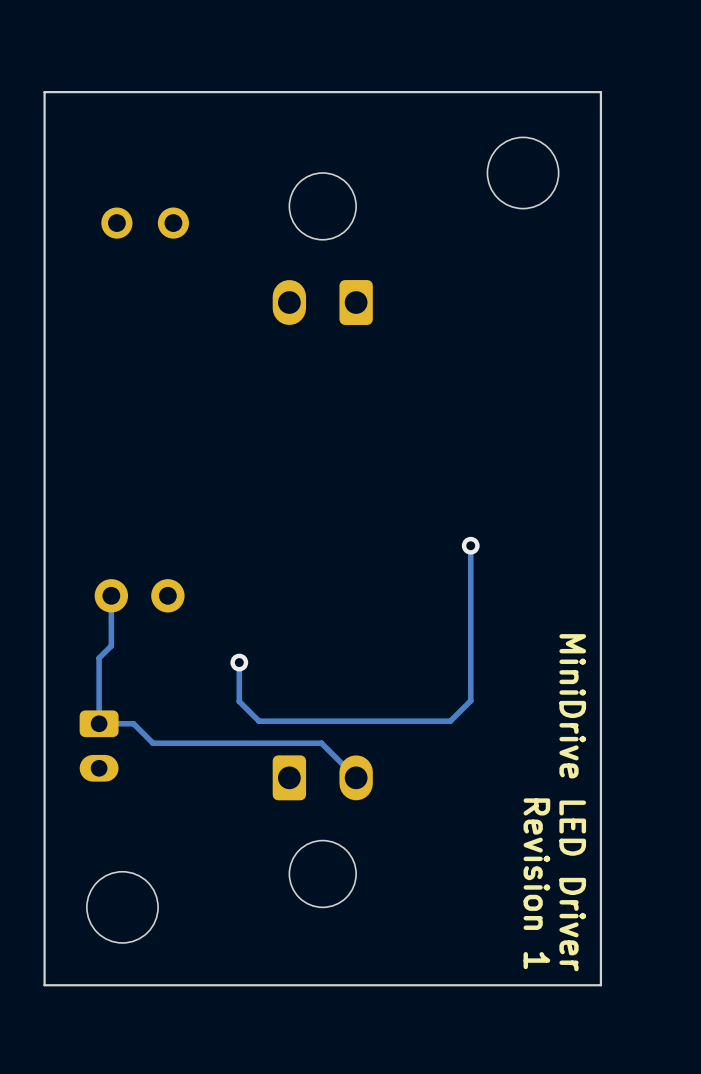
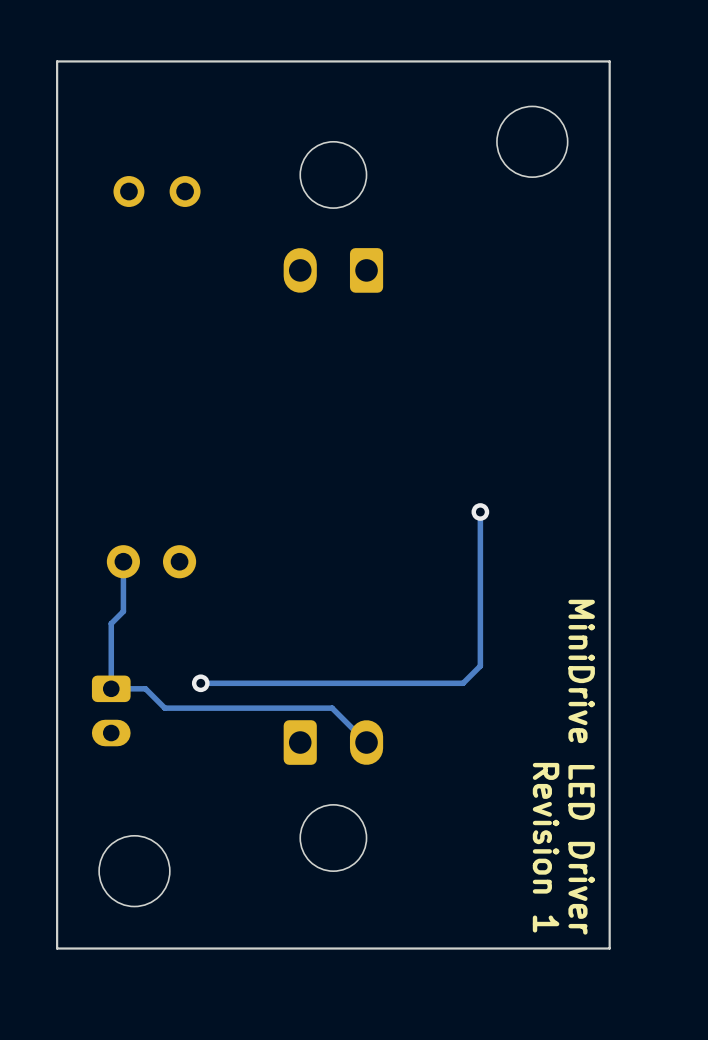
track: (239, 662) (239, 701) (259, 721) (450, 721) (453, 718) -> (200, 683) (463, 683)
via position: (239, 662) -> (200, 683)

